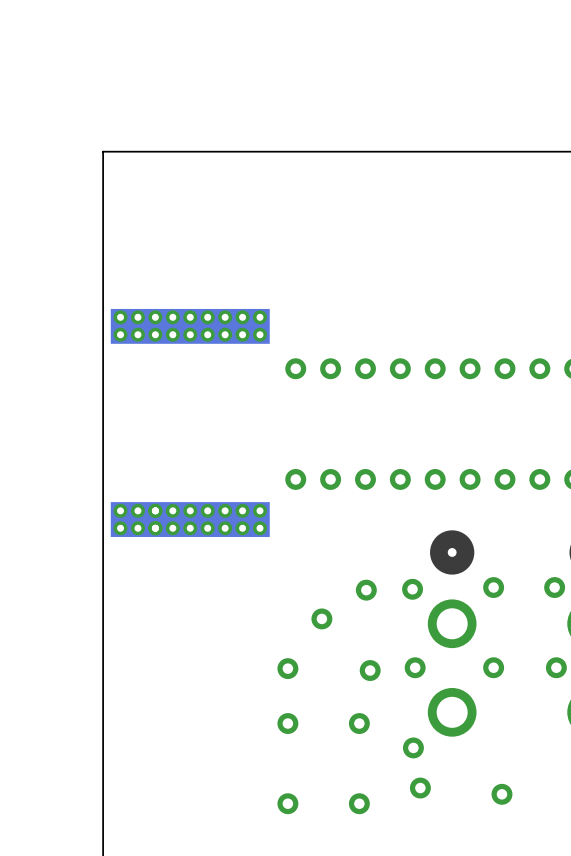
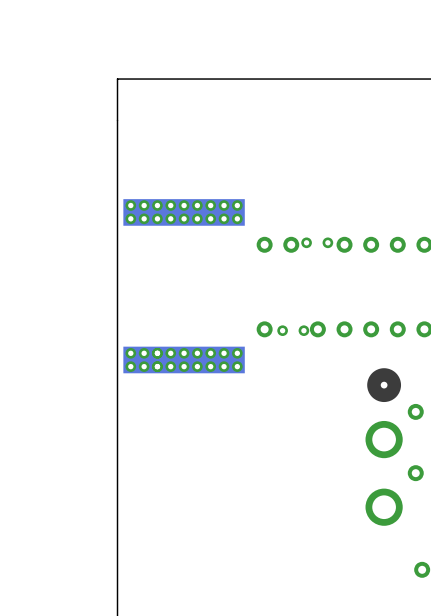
via: none -> (306, 242)
via: none -> (327, 242)
via: (365, 368) -> none
via: (330, 479) -> none
via: none -> (282, 330)
via: none -> (303, 330)
via: (412, 589) -> none
via: (366, 590) -> none
via: (321, 618) -> none
via: (415, 667) -> none
via: (287, 668) -> none
via: (370, 670) -> none
via: (287, 723) -> none
via: (359, 723) -> none
via: (413, 747) -> none
via: (420, 788) -> none
via: (287, 803) -> none
via: (359, 803) -> none

